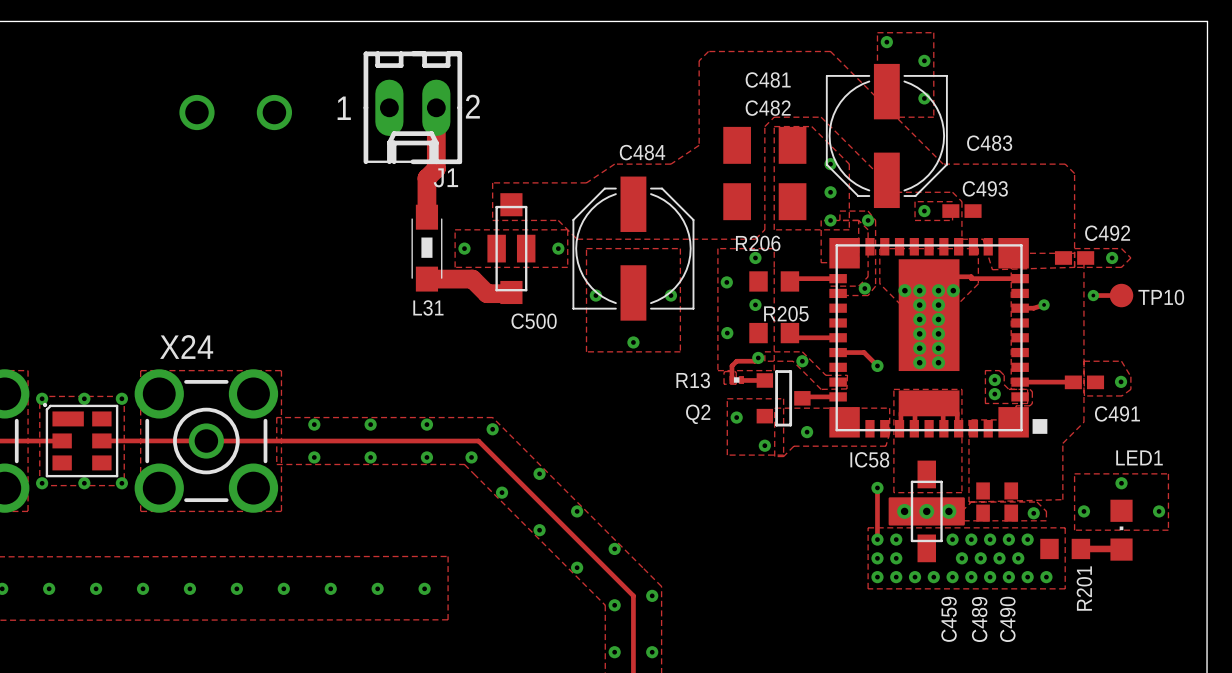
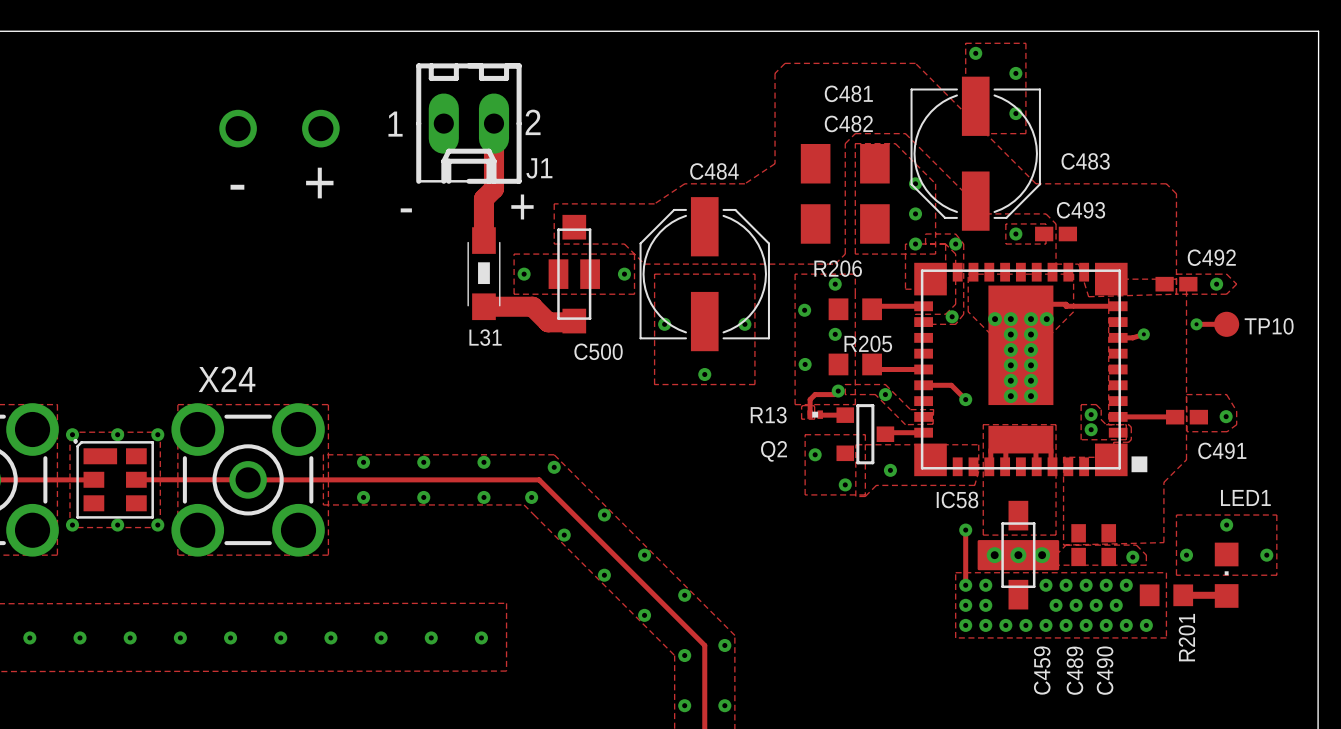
text: none -> + (319, 183)
text: none -> - (237, 187)
J1 name position: J1 (445, 177) -> J1 (539, 168)
text: none -> + (522, 206)
text: none -> - (406, 210)

